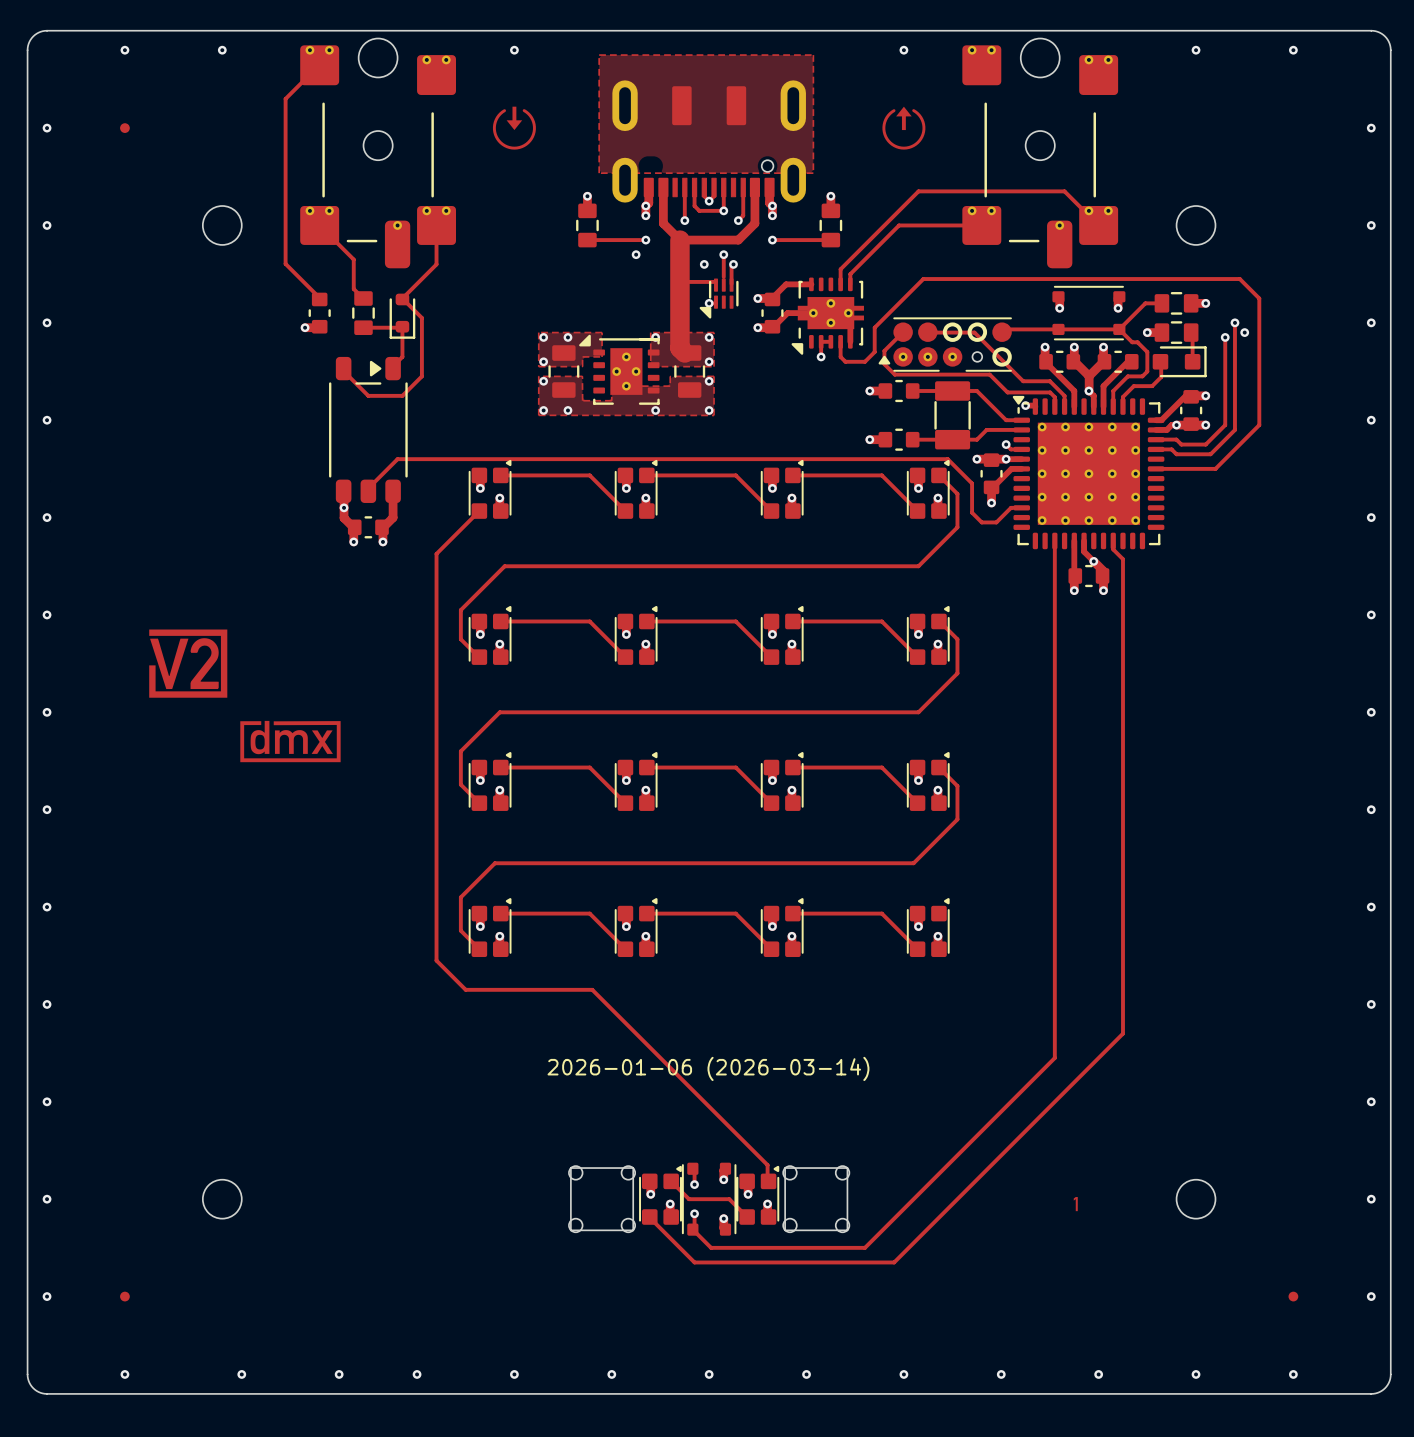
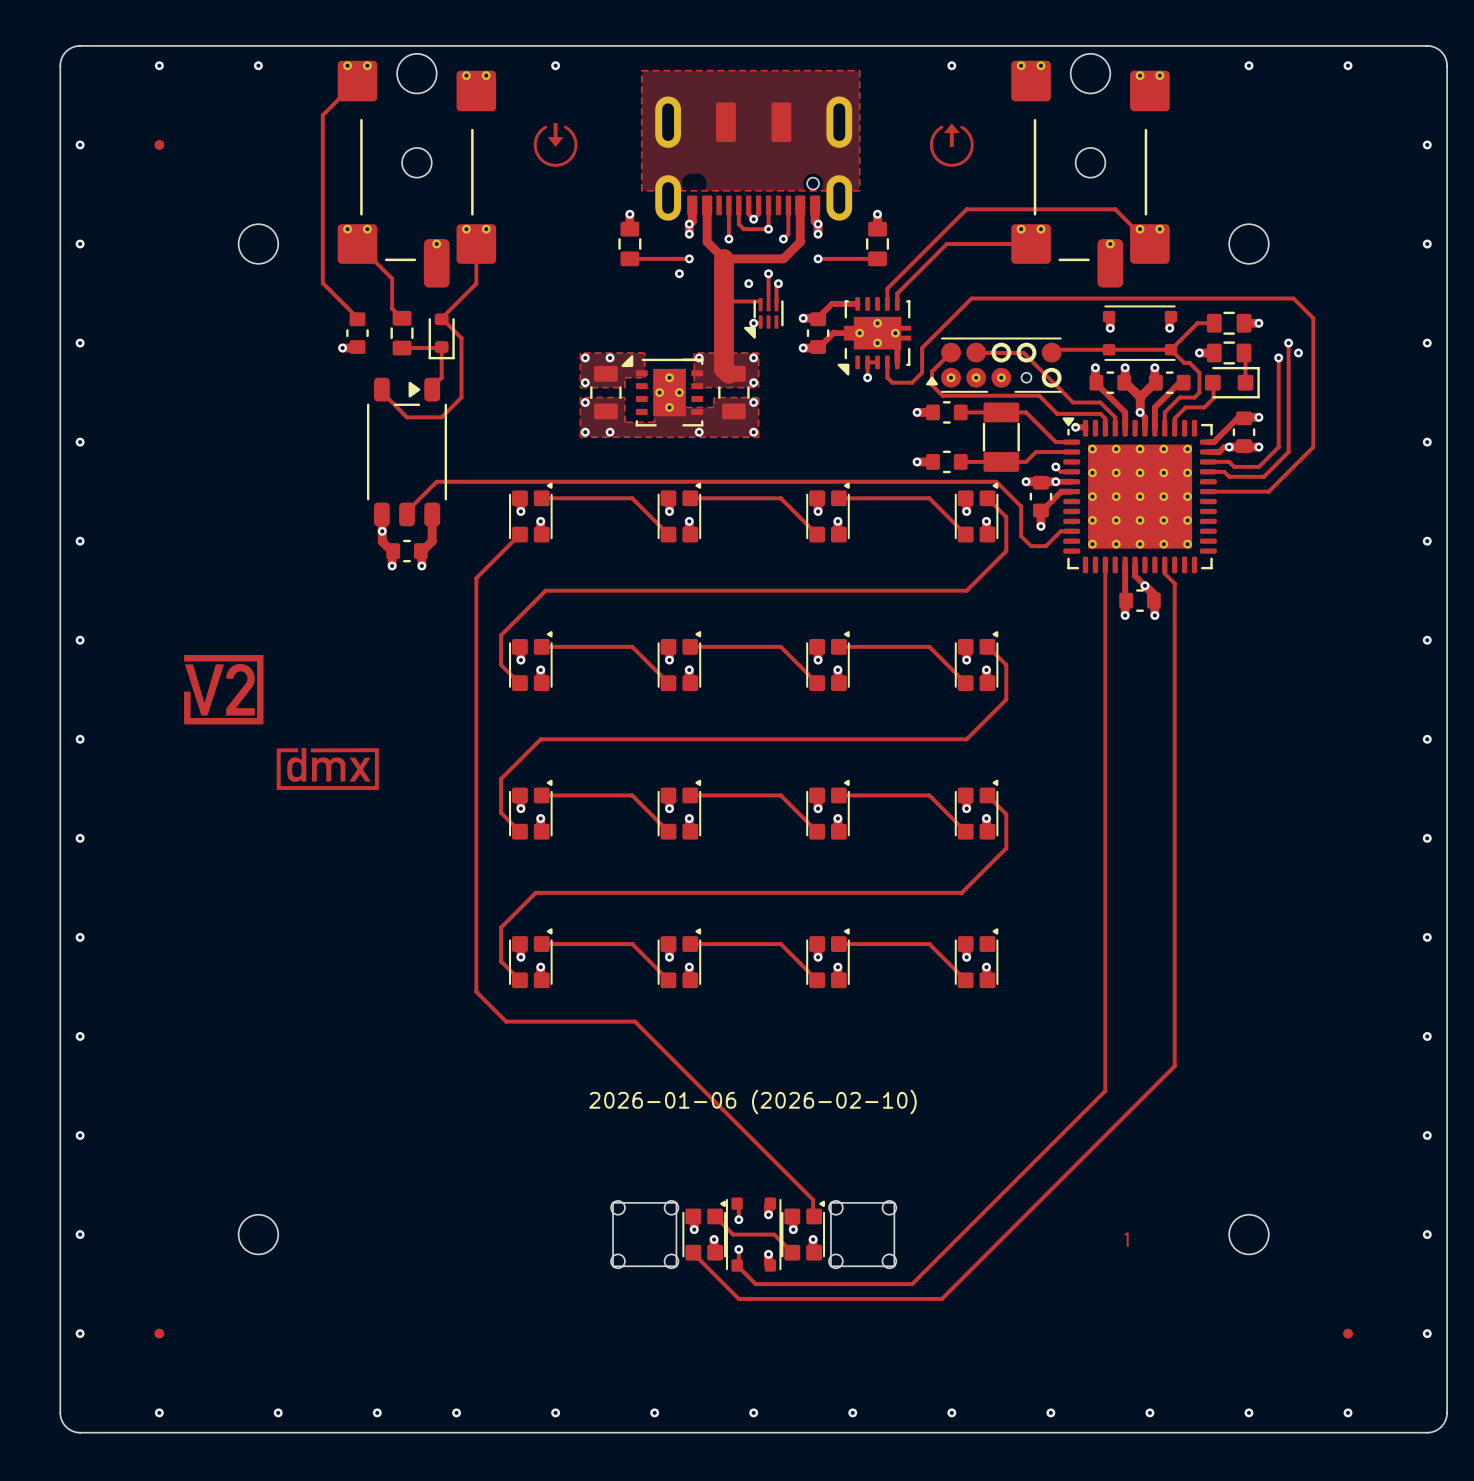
drawing shape: [547, 1056, 870, 1082] -> [589, 1089, 917, 1115]

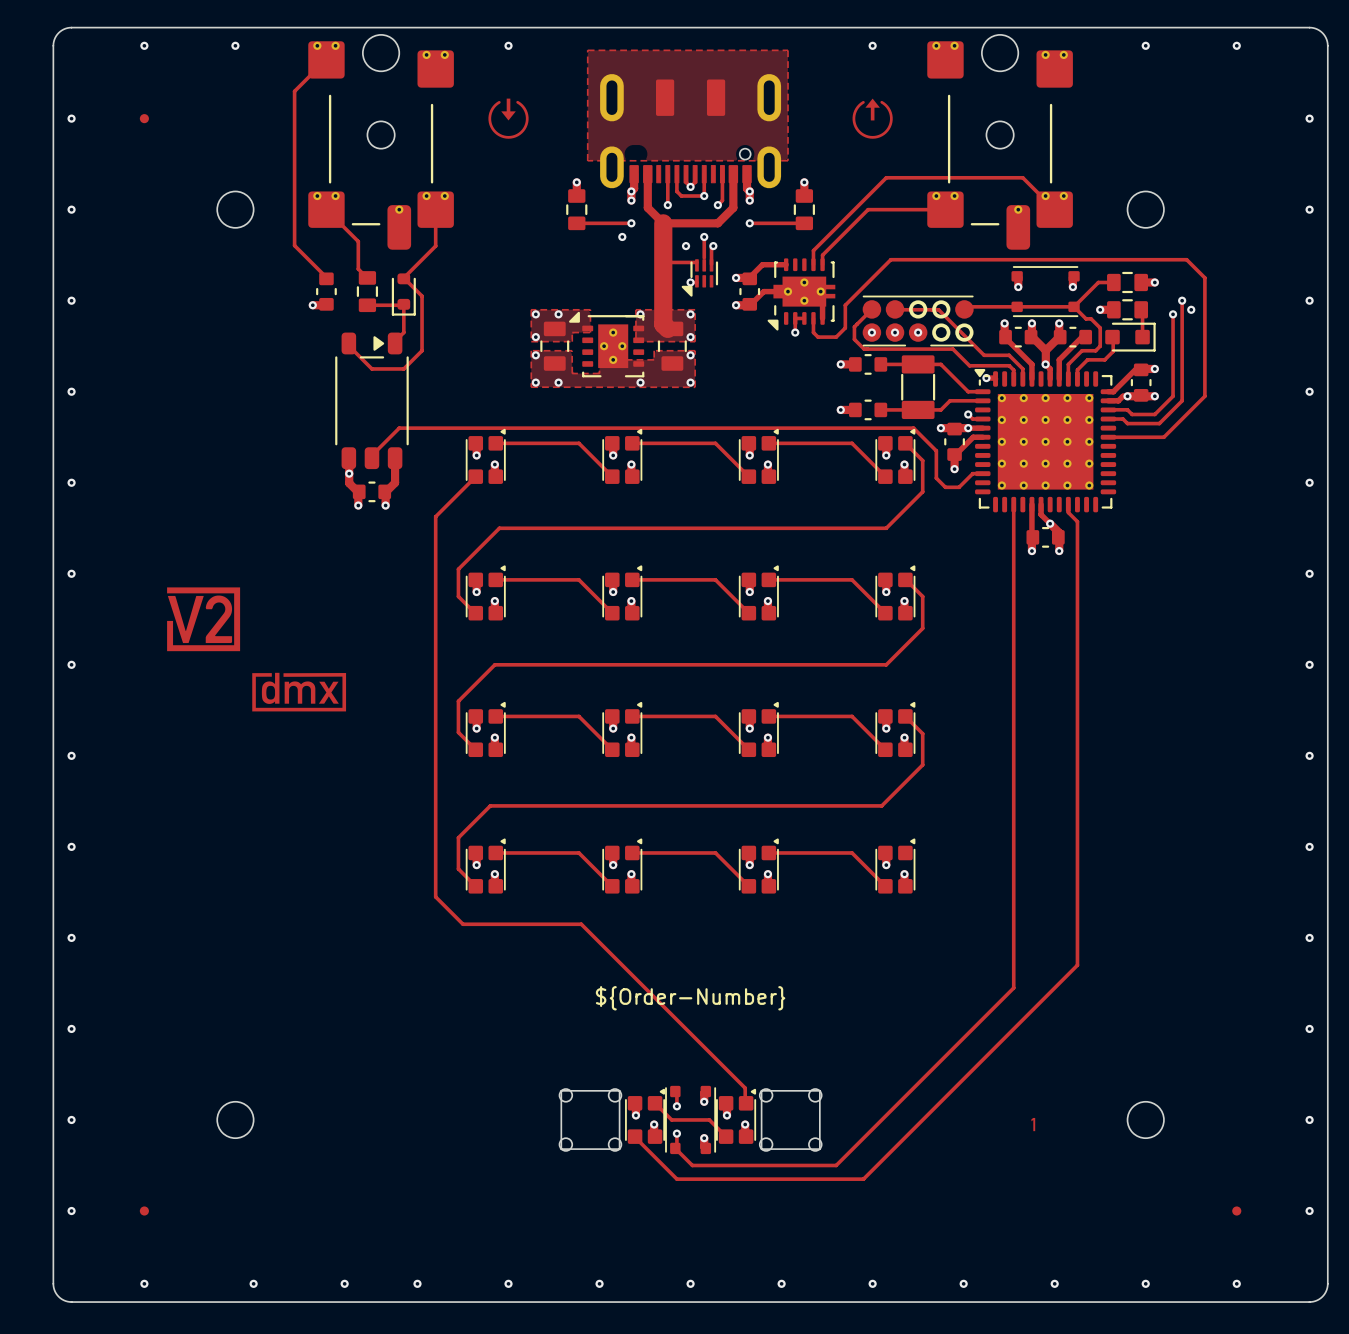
part footprint: [926, 337, 1062, 393] -> [862, 295, 974, 347]
via: none -> (871, 332)
via: none -> (895, 332)
via: none -> (918, 332)
drawing shape: [589, 1089, 917, 1115] -> [595, 986, 786, 1011]

